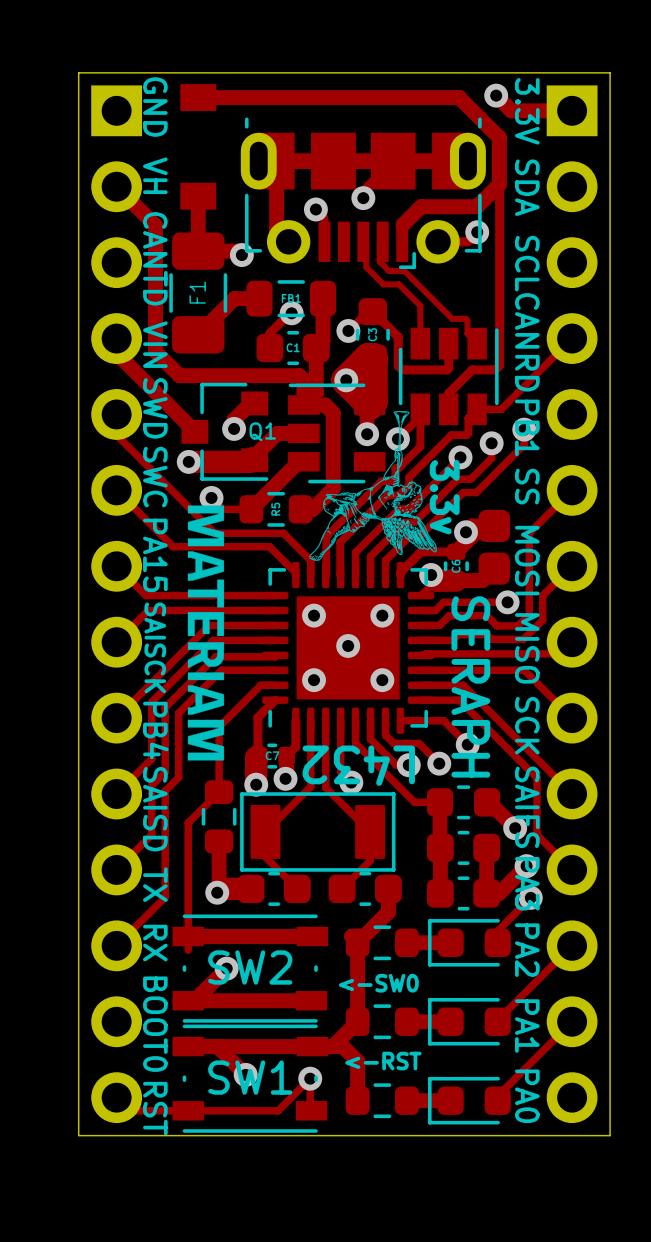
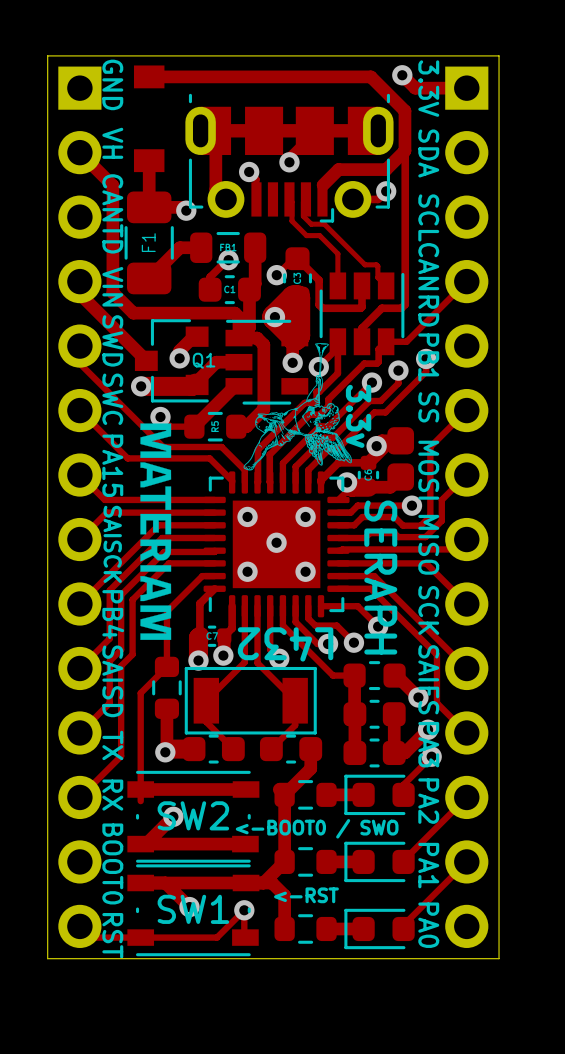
text: <-SW0 (378, 983) -> <-BOOT0 / SWO (317, 828)

